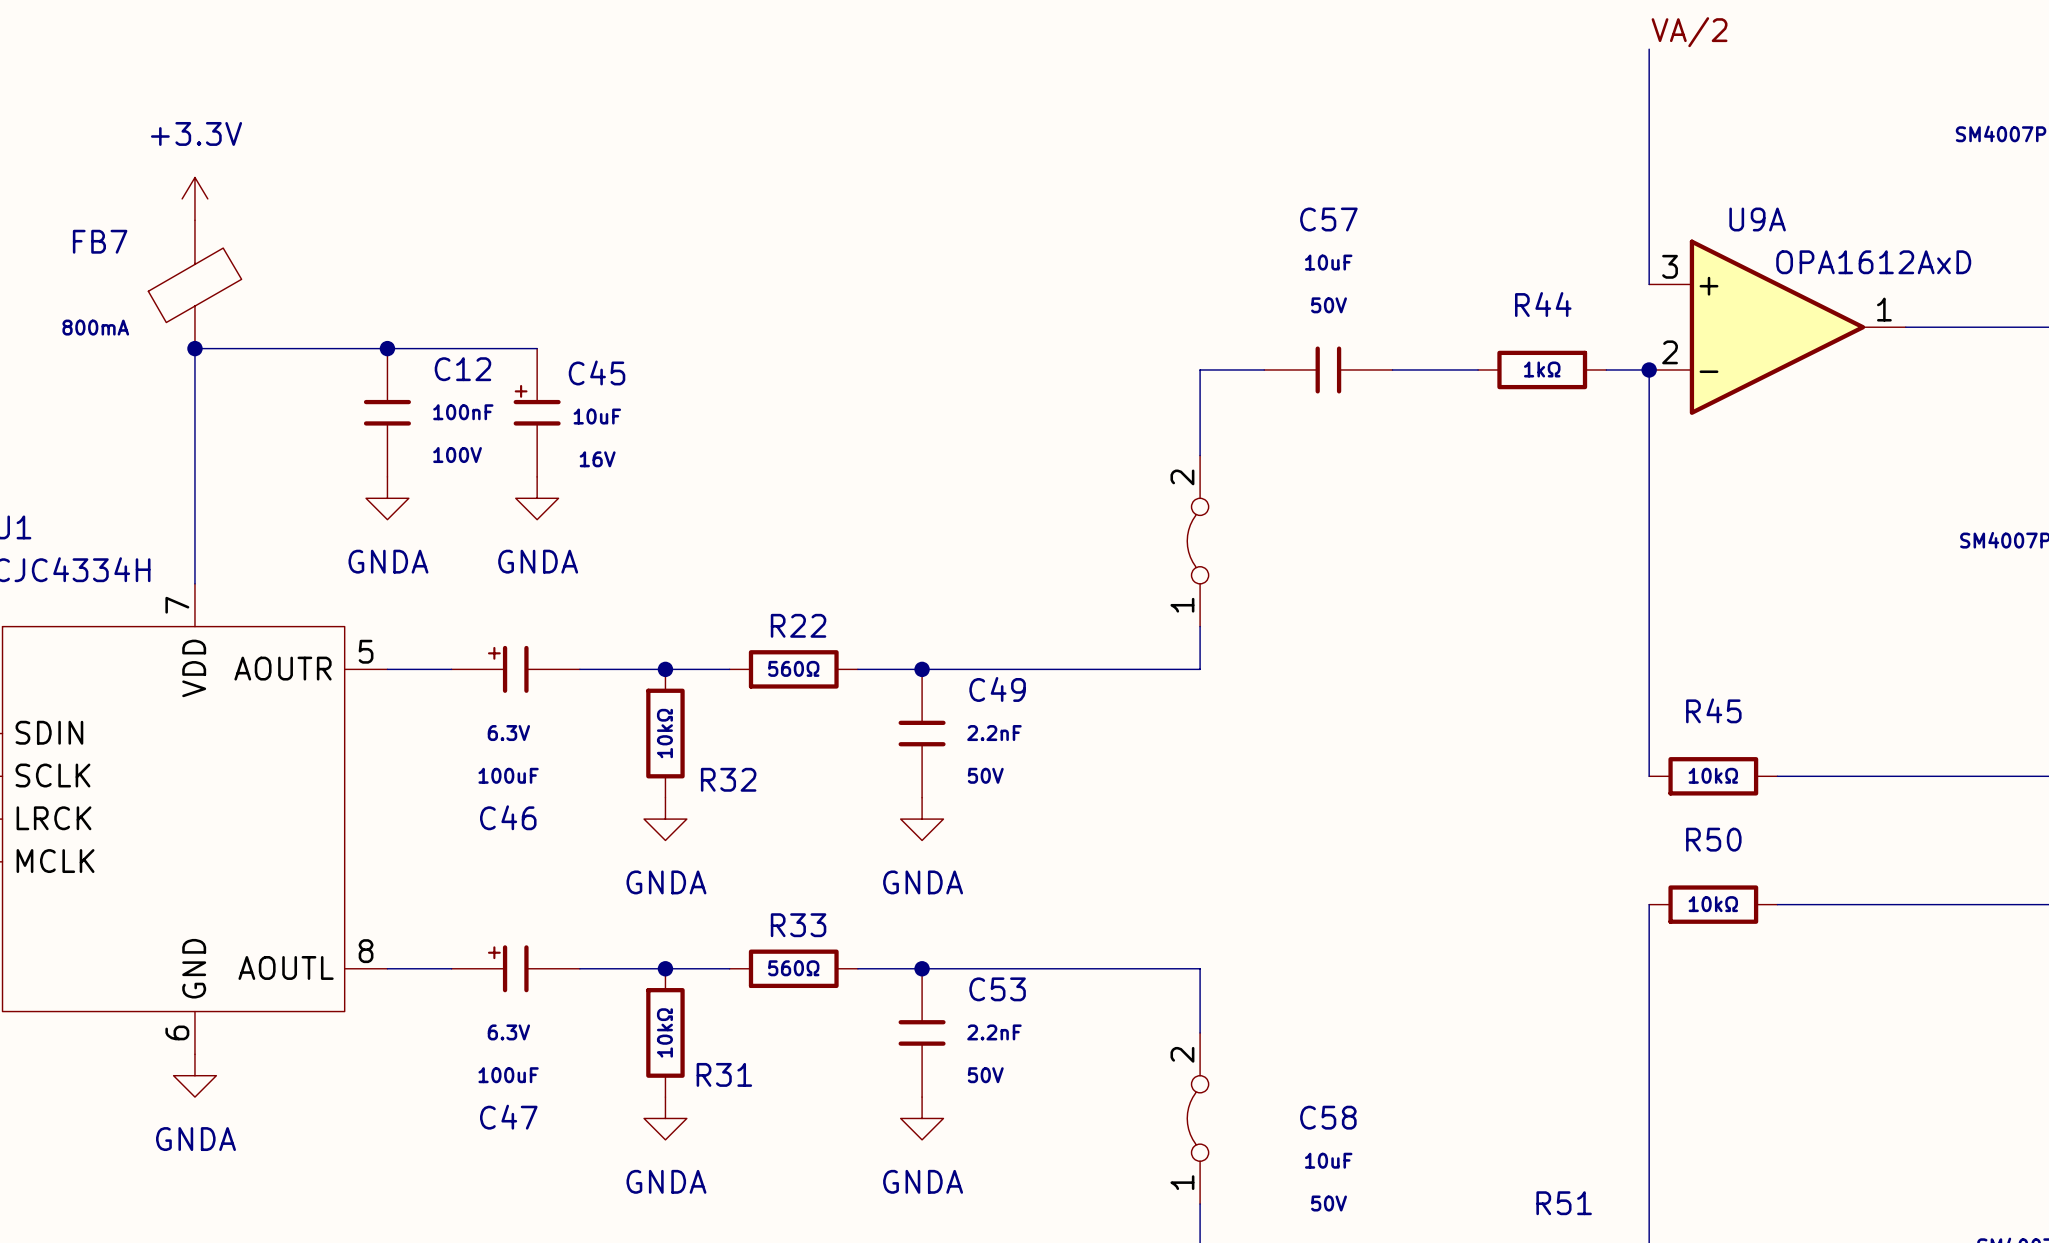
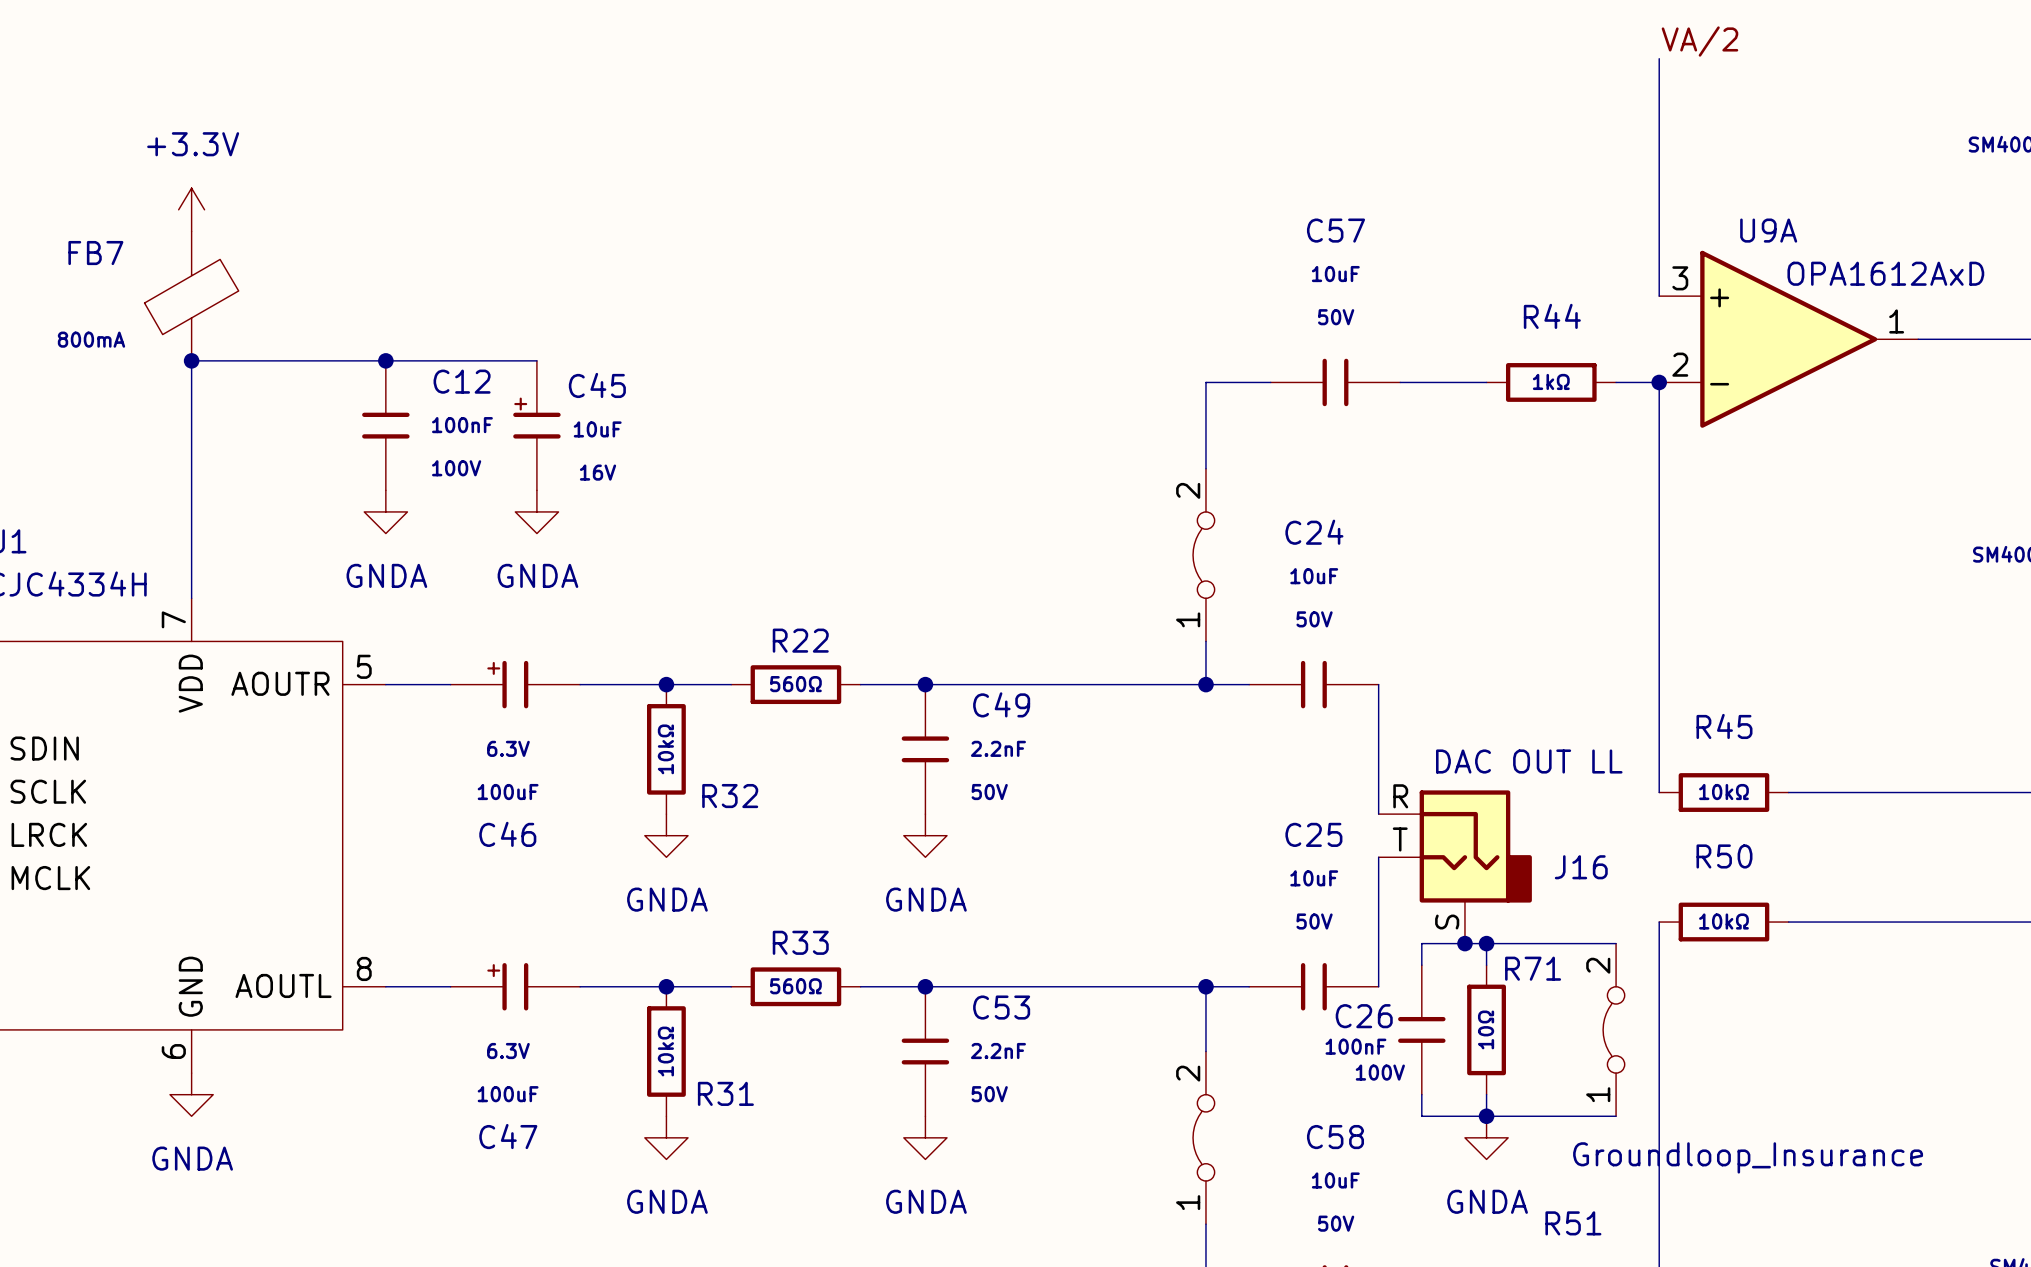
wire: none -> (1205, 684) (1249, 684)
junction: none -> (1205, 684)
C24: none -> 10uF (1313, 684)
wire: none -> (1378, 684) (1378, 814)
wire: none -> (1378, 857) (1378, 986)
J16: none -> DAC OUT LL (1455, 866)
junction: none -> (1464, 943)
wire: none -> (1486, 943) (1486, 965)
junction: none -> (1486, 943)
wire: none -> (1616, 943) (1421, 943) (1421, 965)
wire: none -> (1205, 986) (1249, 986)
junction: none -> (1205, 986)
C25: none -> 10uF (1313, 986)
C26: none -> 100nF (1421, 1029)
R71: none -> 10Ω (1486, 1029)
part: none -> Groundloop_Insurance (1613, 1029)
wire: none -> (1421, 1094) (1421, 1116) (1616, 1116)
wire: none -> (1486, 1094) (1486, 1116)
junction: none -> (1486, 1116)
power symbol: none -> GNDA (1486, 1137)

